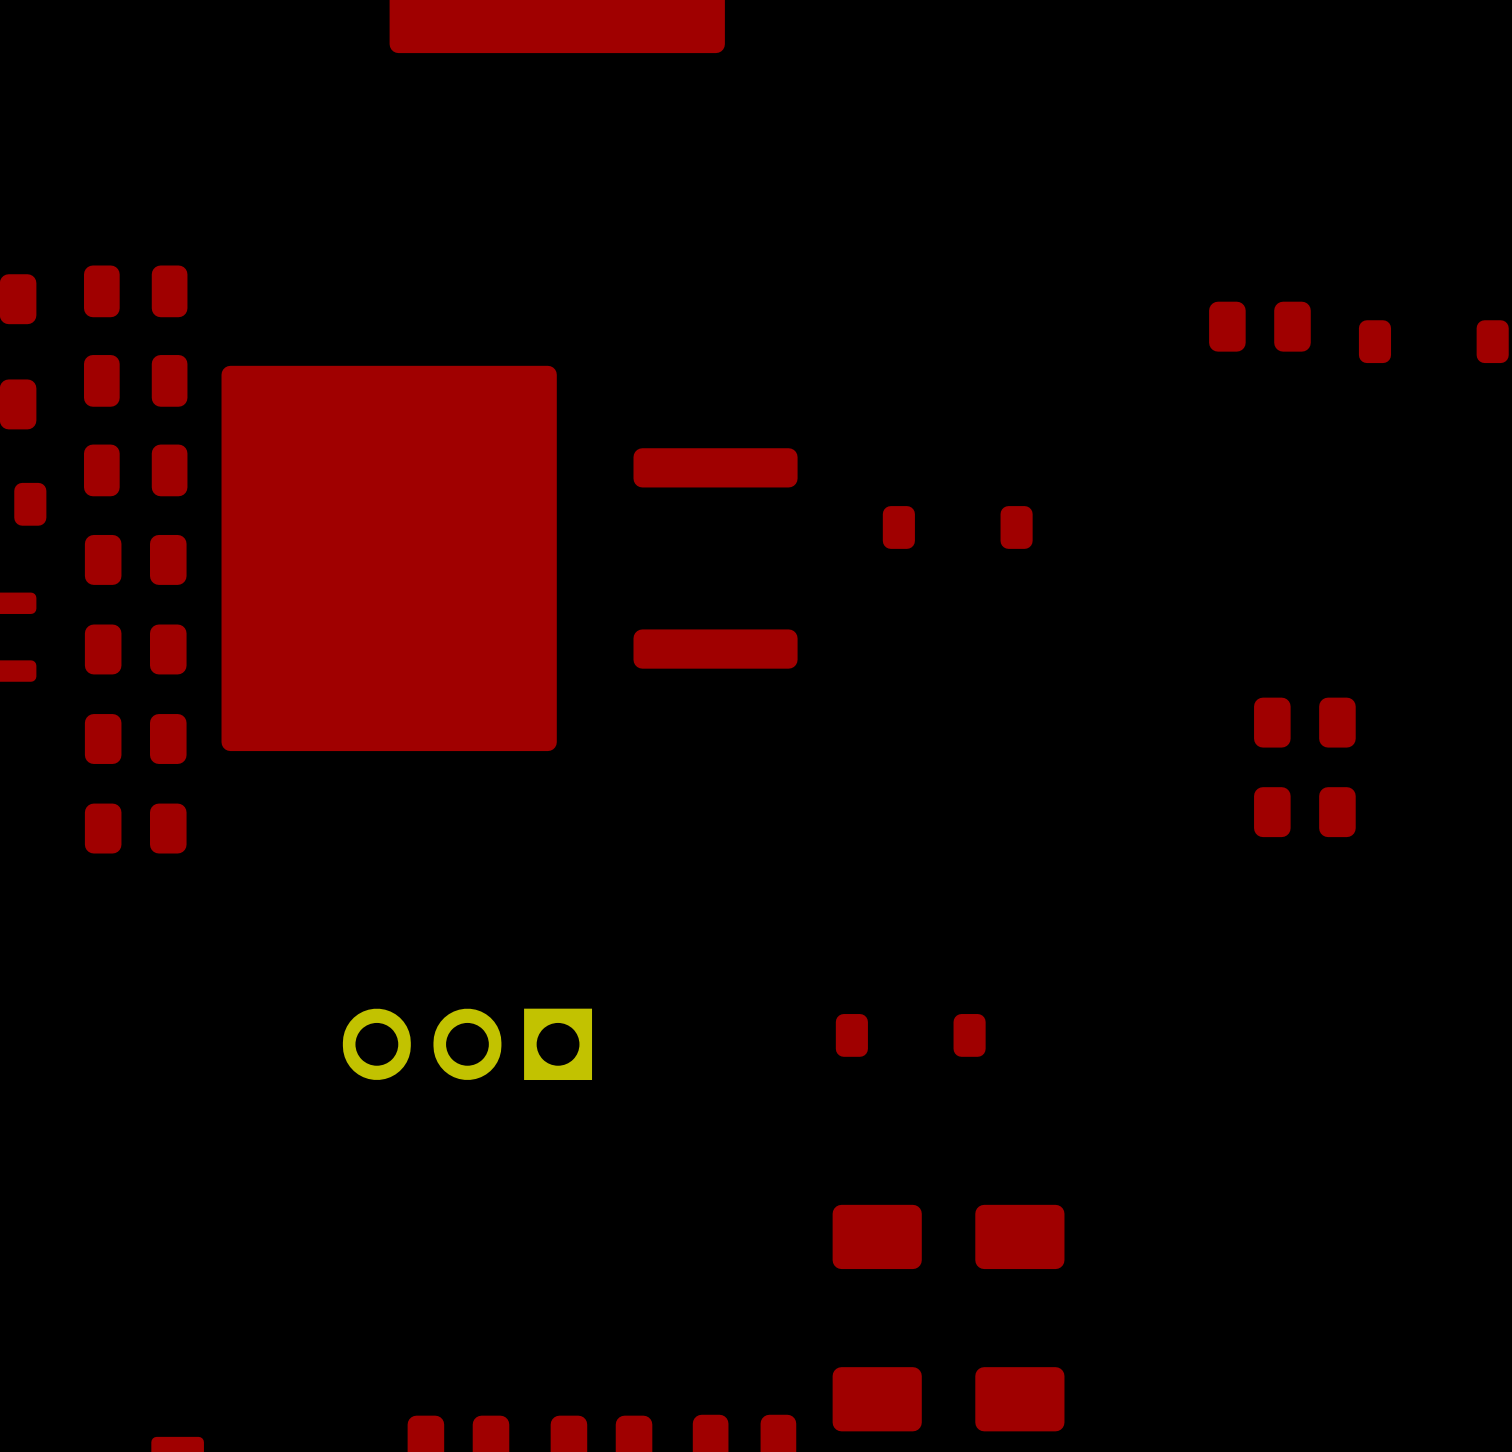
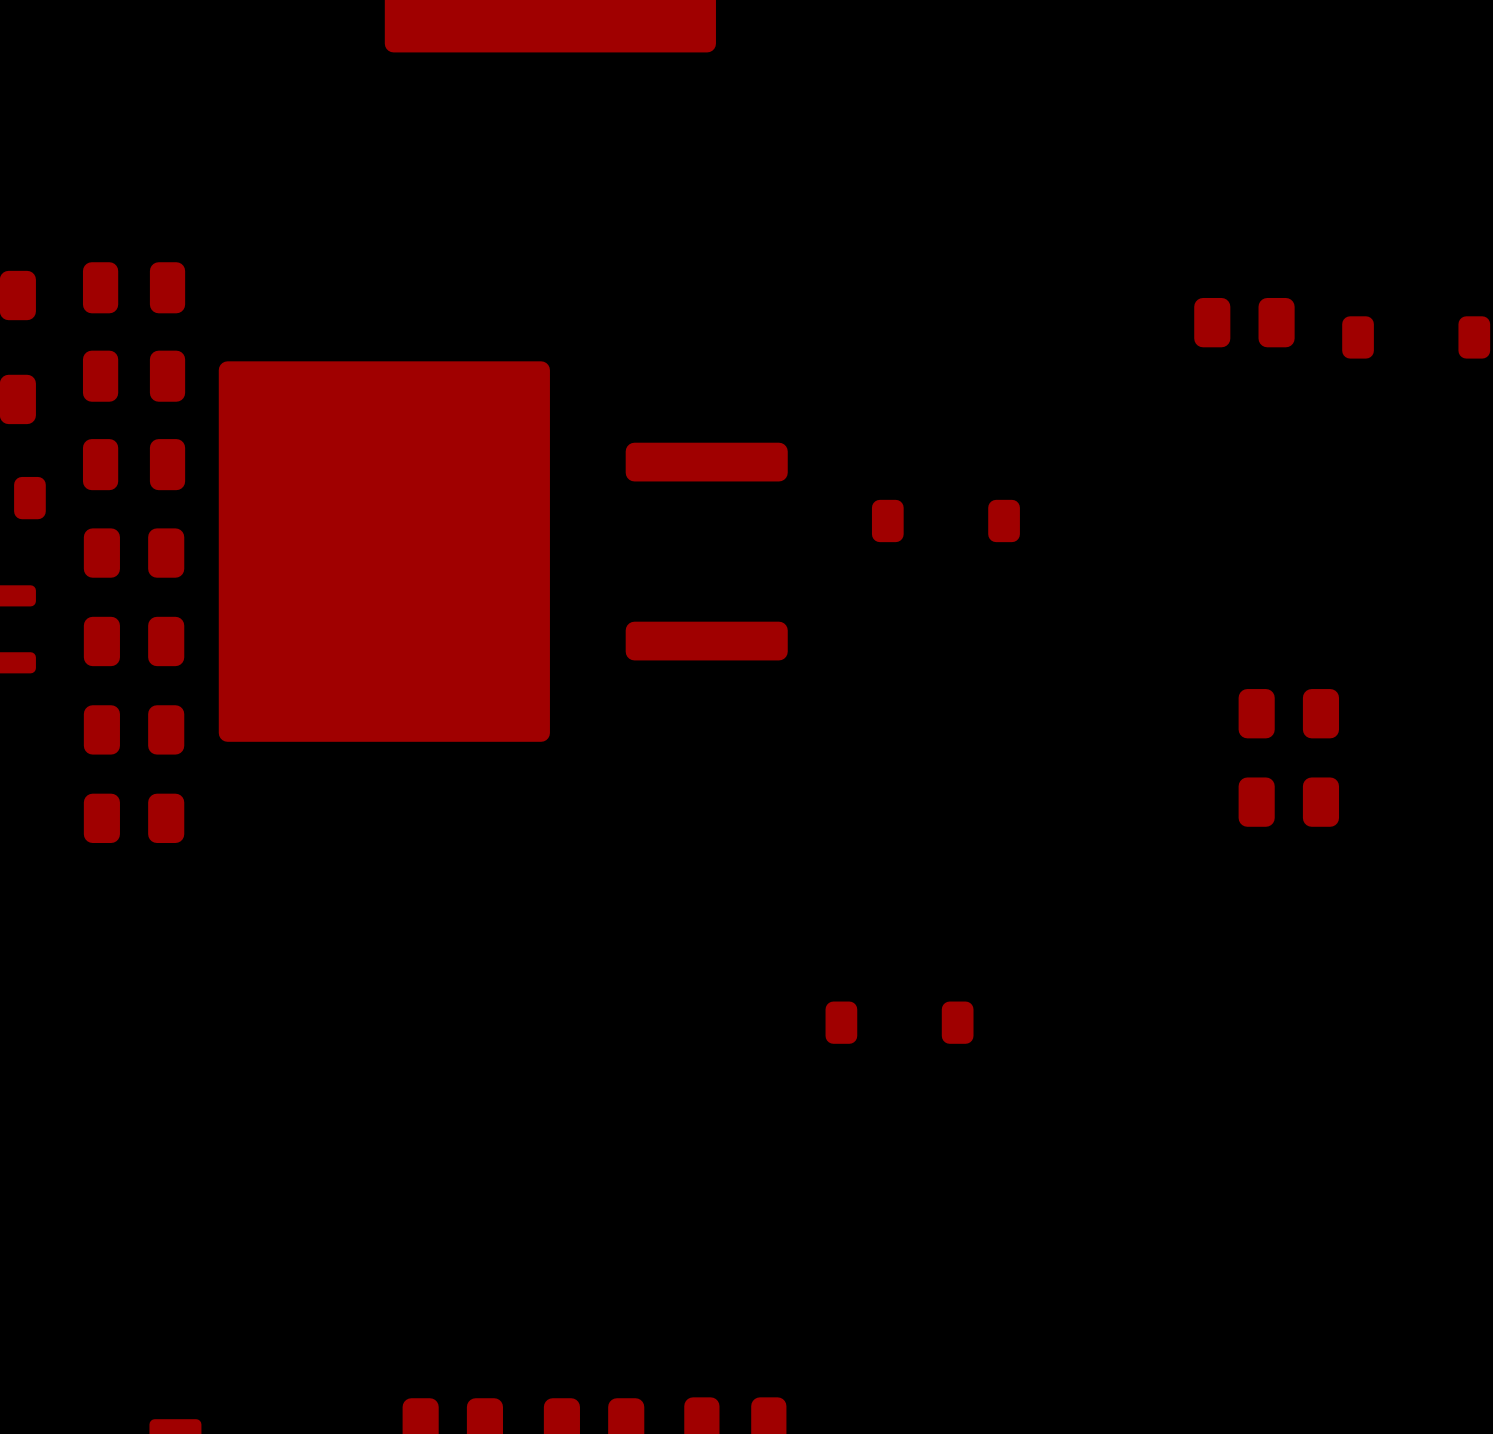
part: (467, 1044) -> none
part: (948, 1236) -> none
part: (948, 1399) -> none

